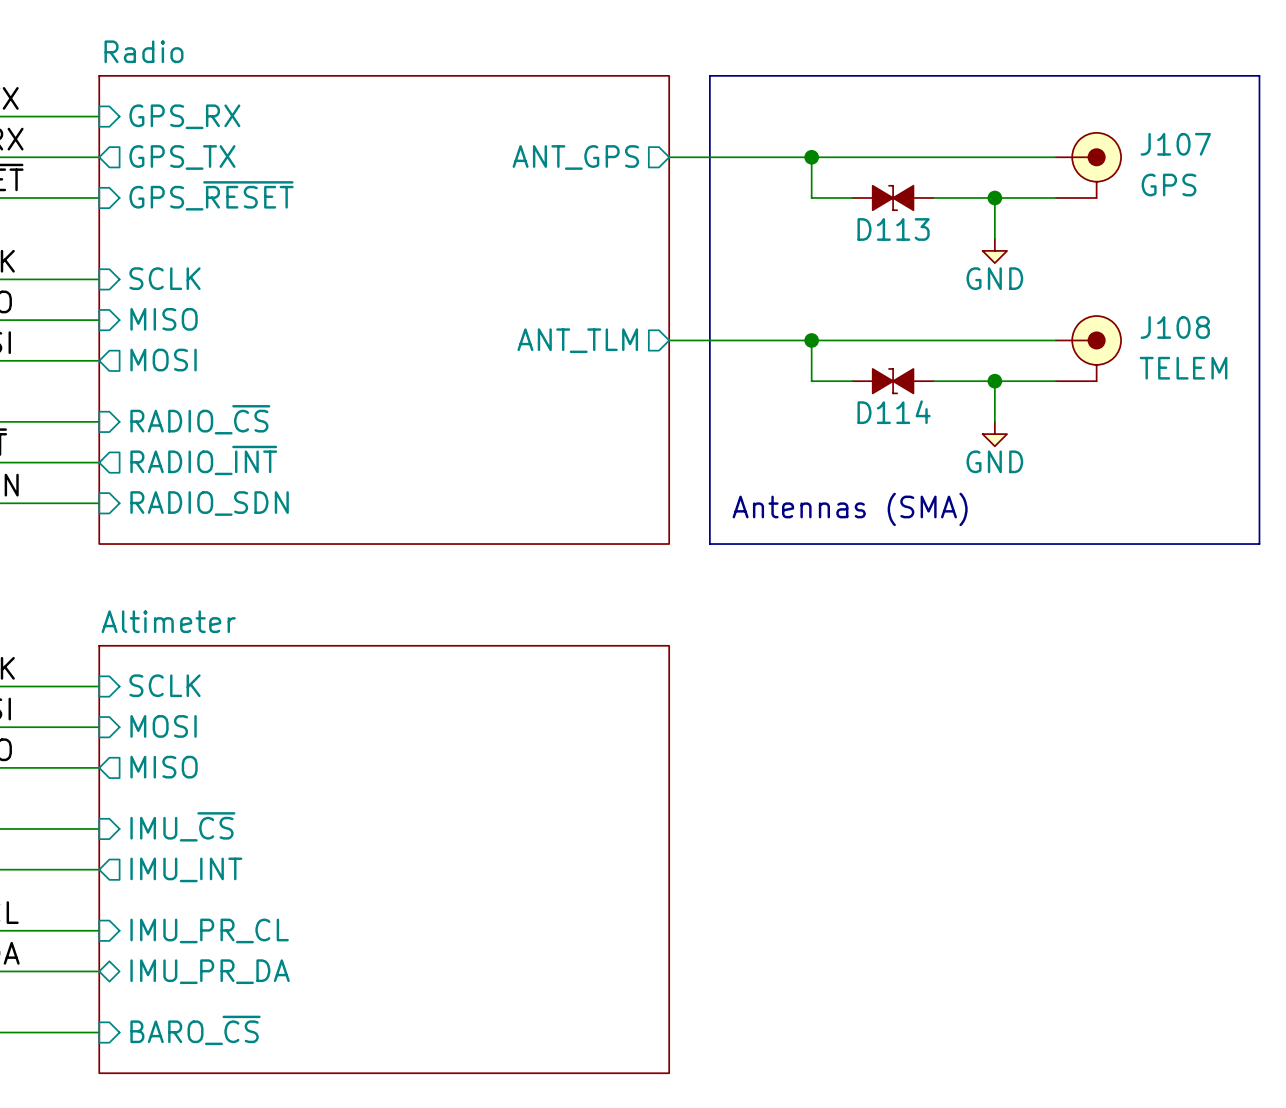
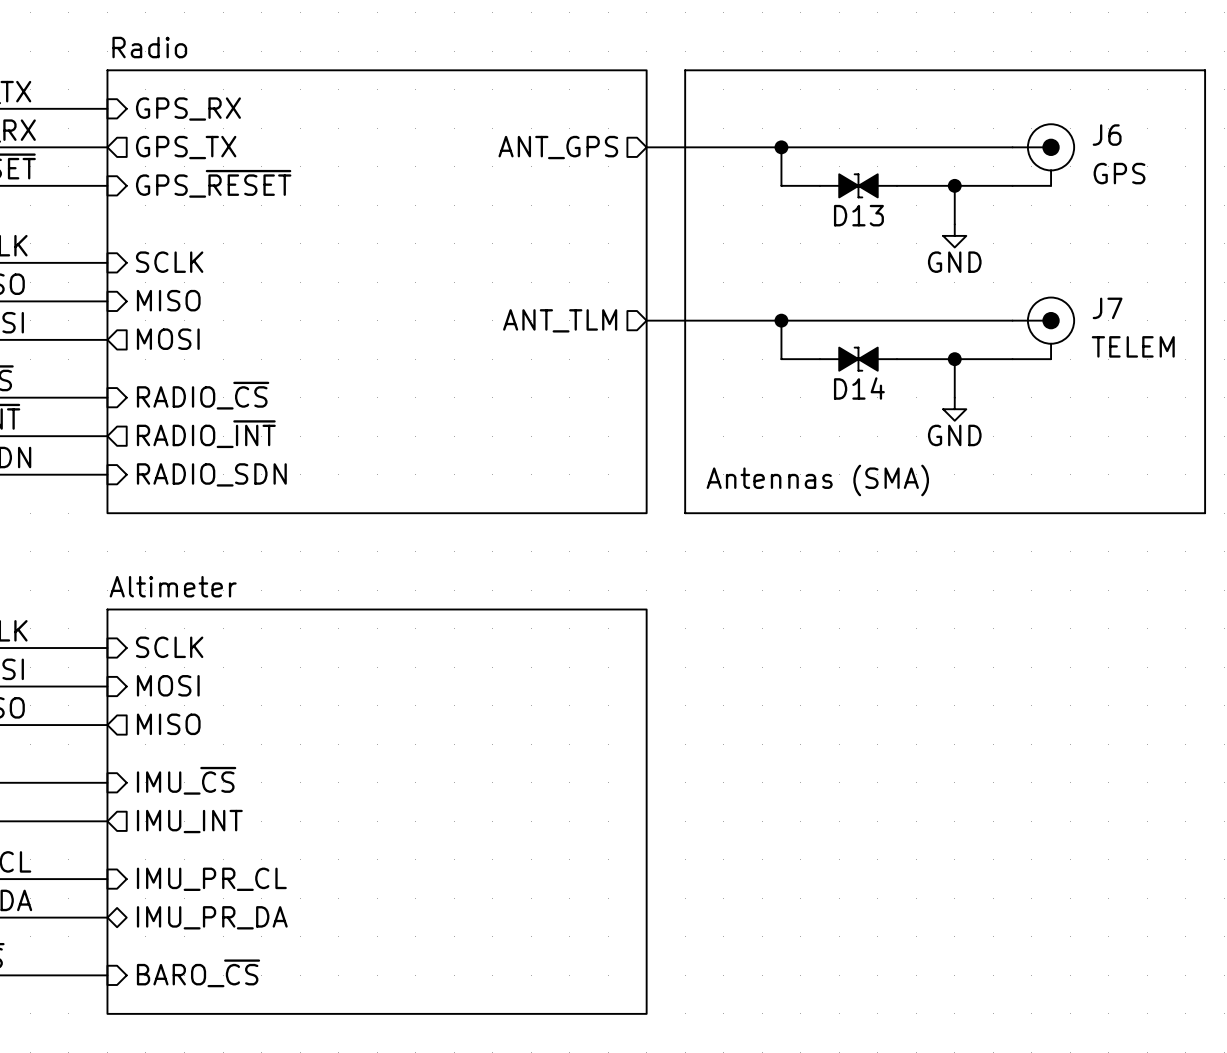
J107 name: J107 (1175, 144) -> J6 (1107, 135)
D113 name: D113 (893, 229) -> D13 (858, 215)
J108 name: J108 (1175, 327) -> J7 (1107, 308)
D114 name: D114 (894, 412) -> D14 (859, 388)

